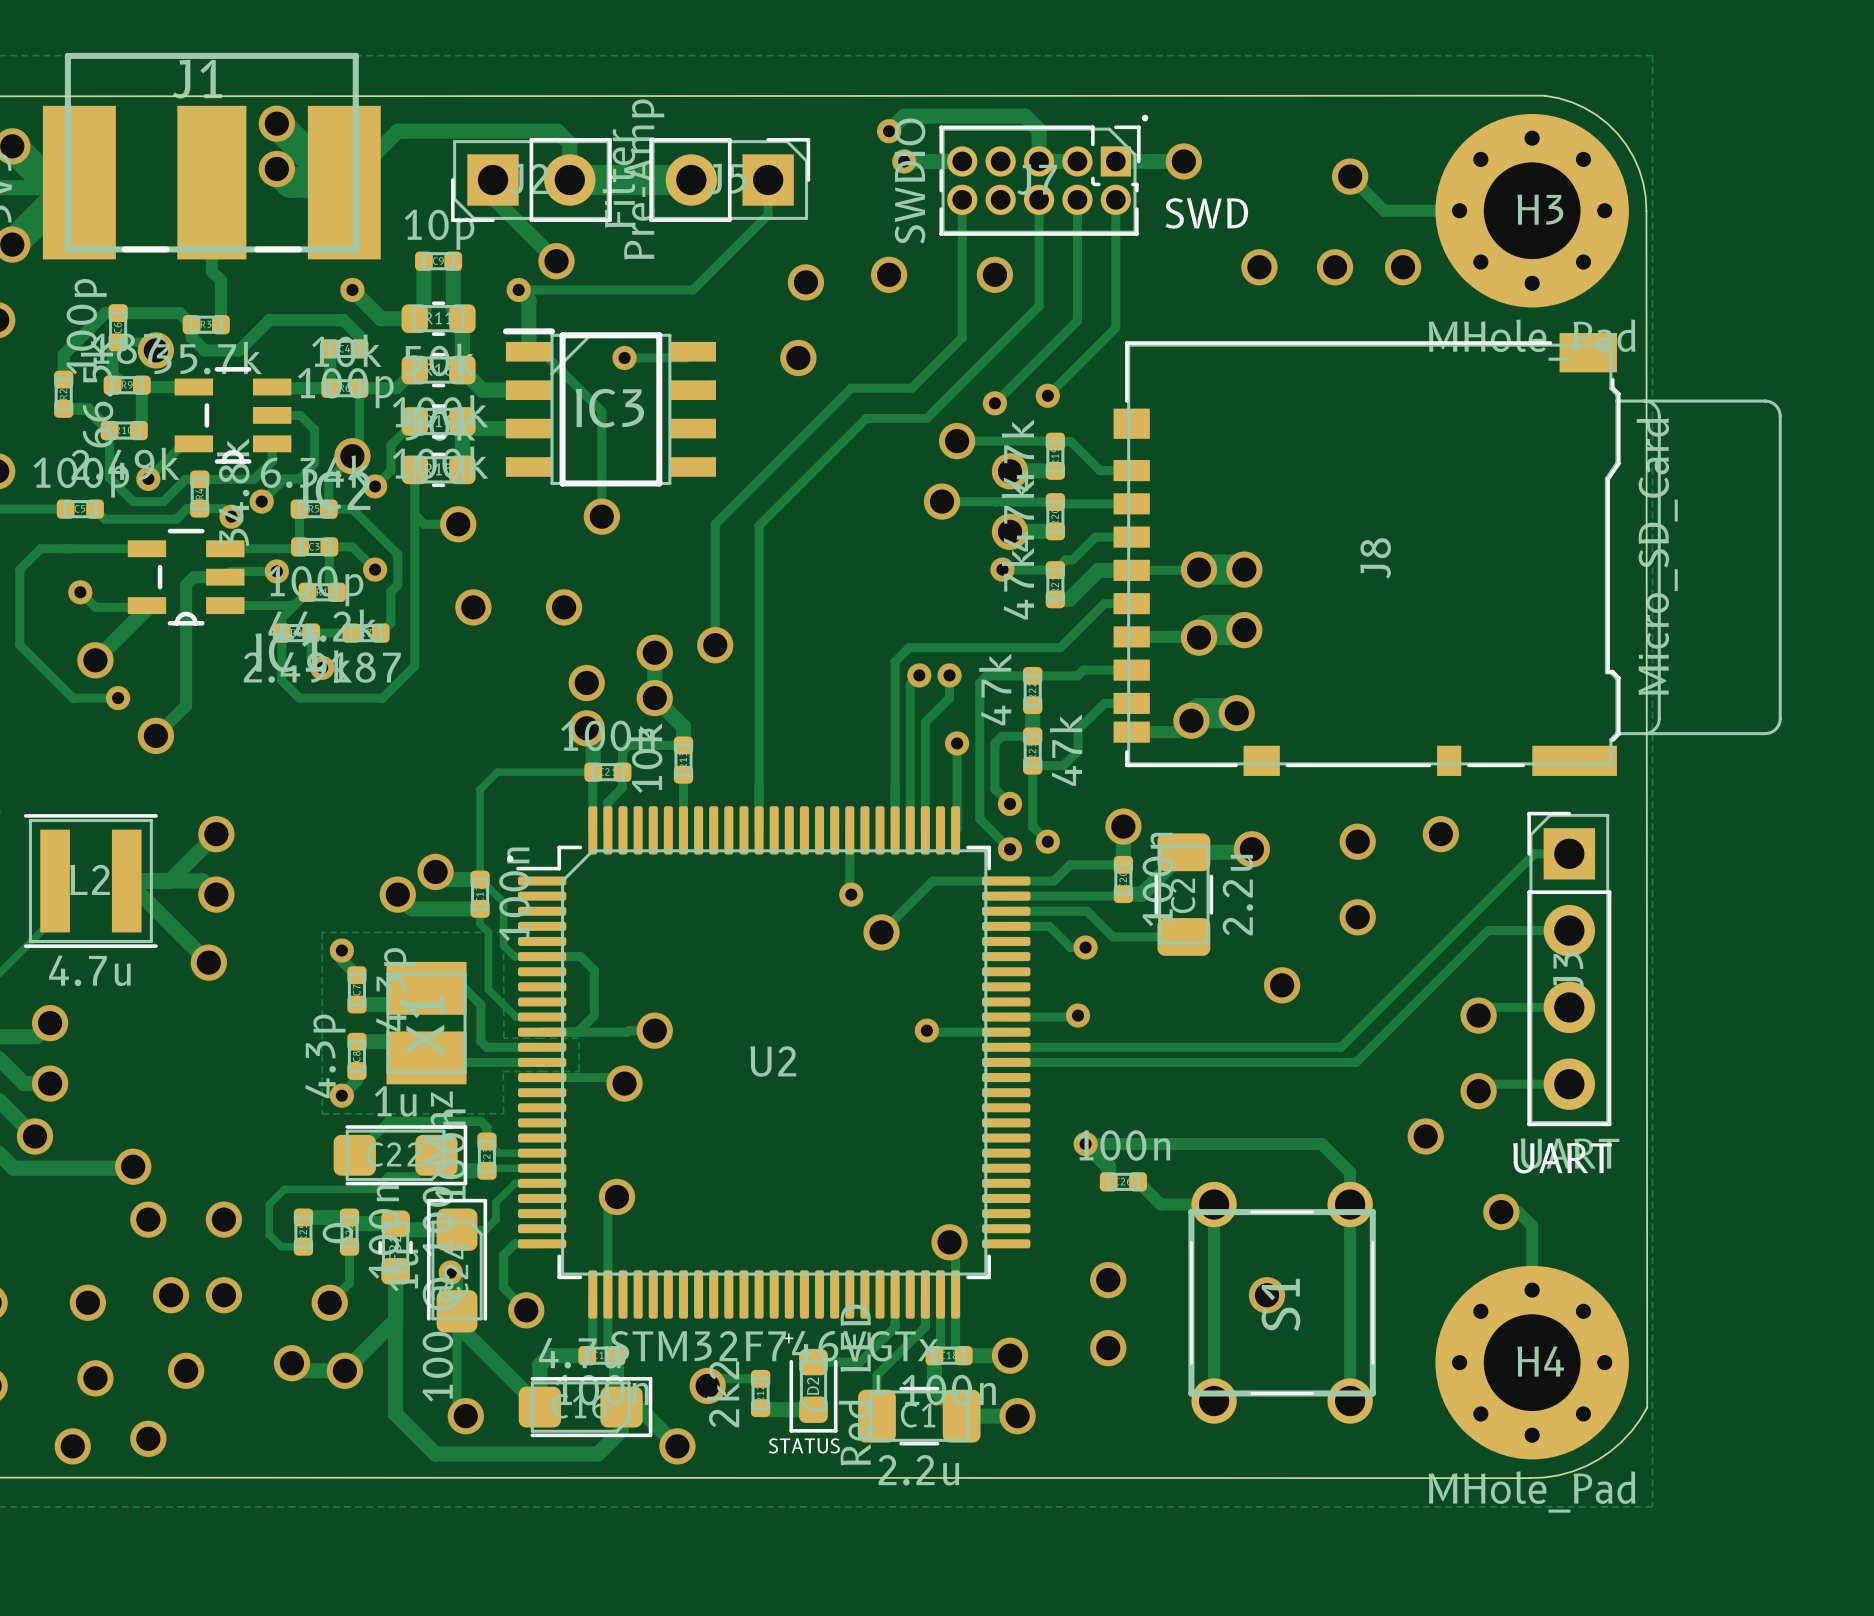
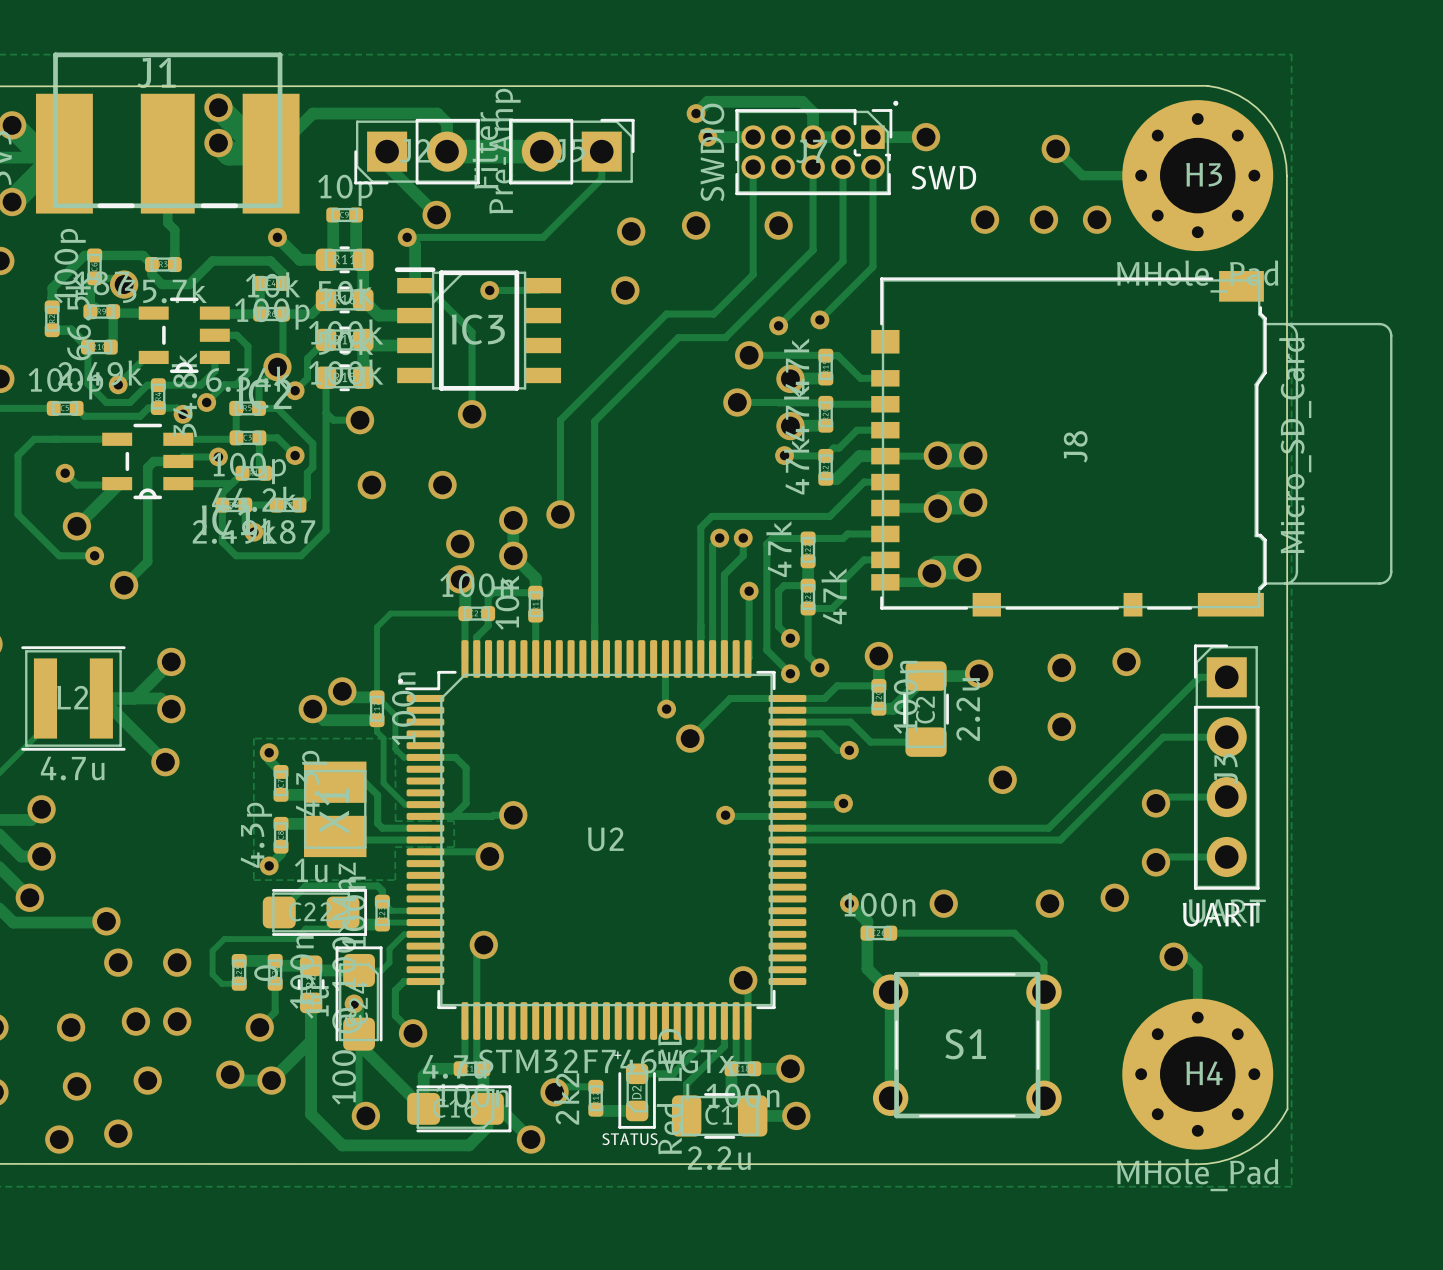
track: (1085, 1144) (1321, 1144) (1350, 1172) (1350, 1401) -> none
via: none -> (943, 903)
via: none -> (1049, 903)
track: none -> (867, 933) (867, 968) (890, 992) (890, 1098)
track: (1138, 1181) (1160, 1204) (1214, 1204) (1214, 1401) -> (890, 933) (1014, 933) (1043, 962) (1043, 1098)
via: (1108, 1280) -> none
via: (1267, 1295) -> none
S1 rotation: 0° (1282, 1302) -> 90° clockwise (967, 1045)
via: (1108, 1348) -> none

